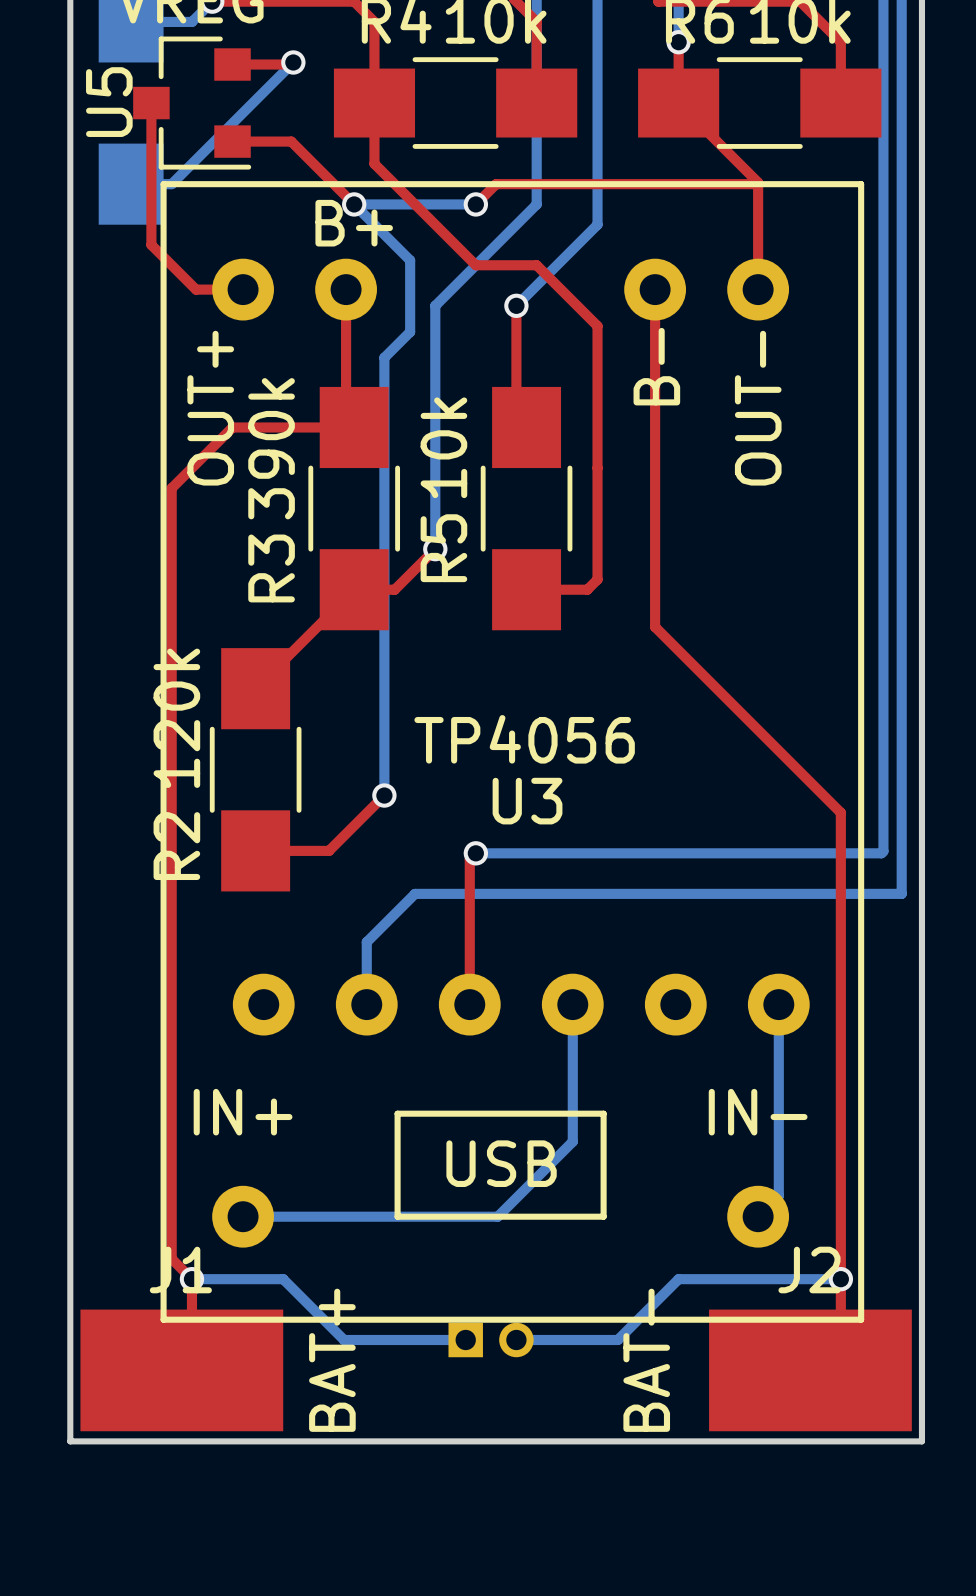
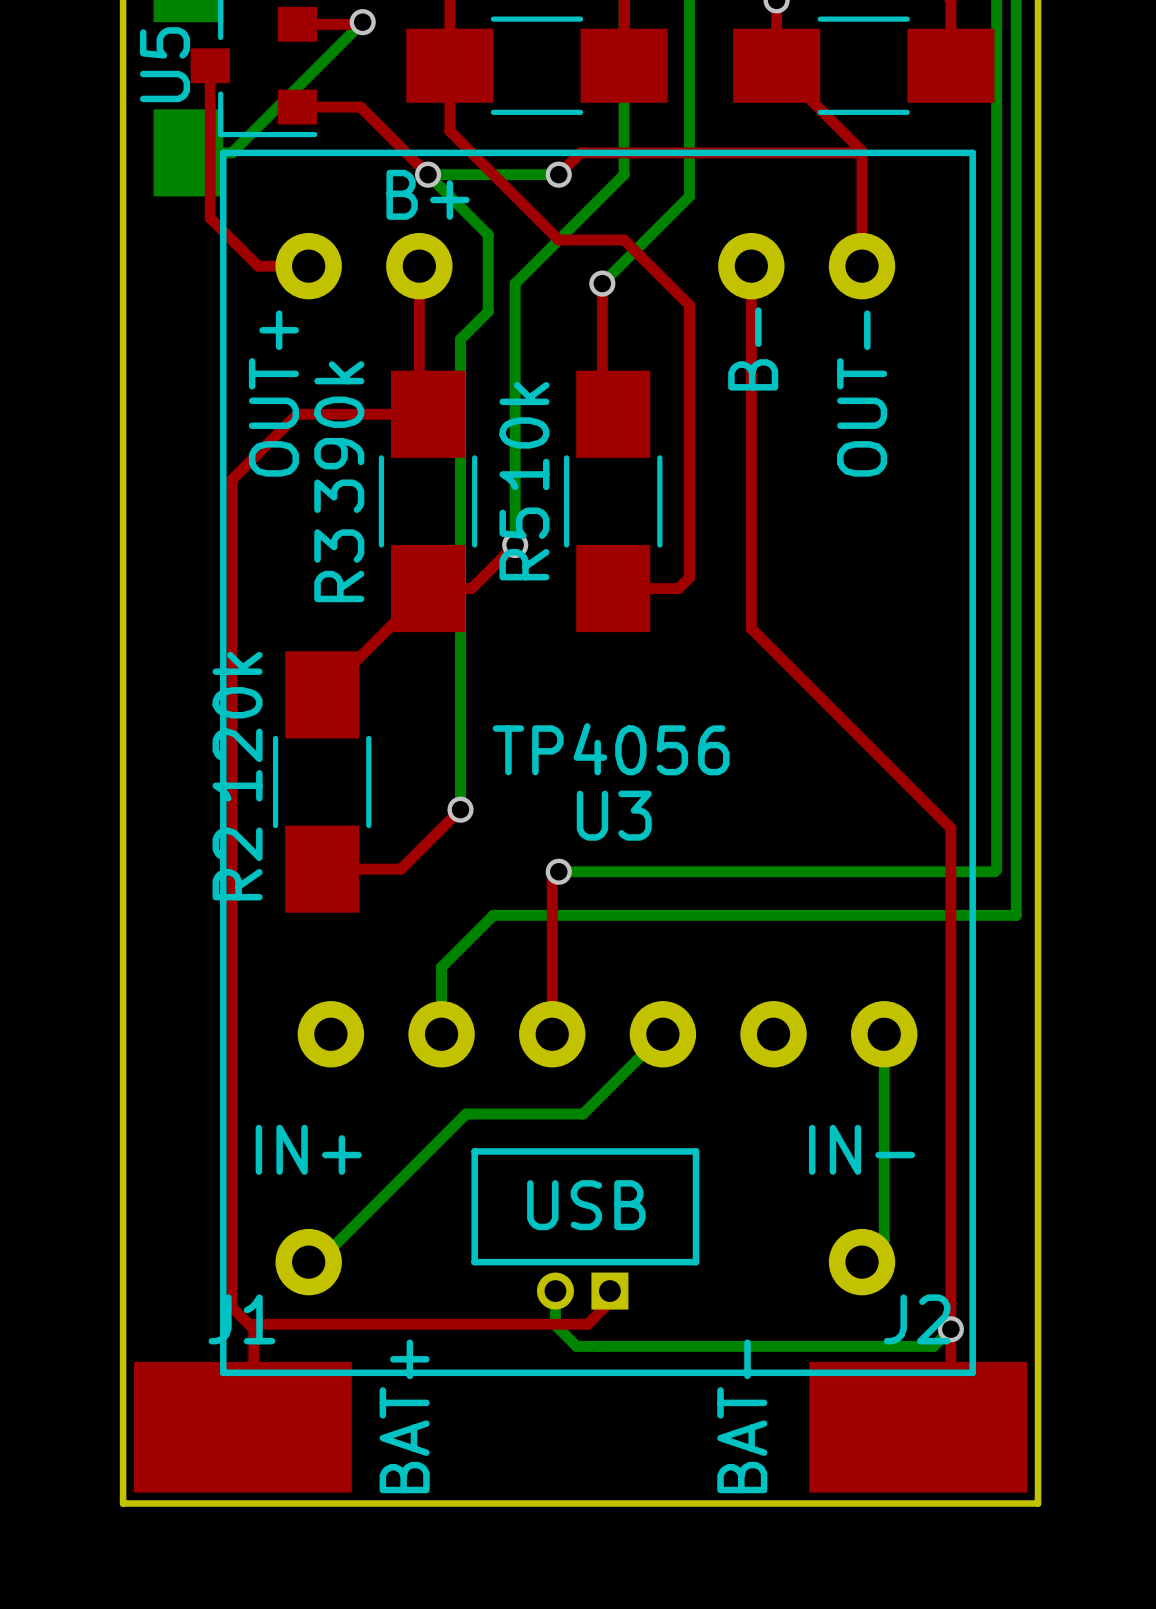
bottom track: (572, 1004) (572, 1141) (497, 1216) (251, 1216) -> (662, 1034) (583, 1114) (466, 1114) (317, 1262)
top track: none -> (620, 1291) (587, 1324) (253, 1324) (253, 1329)
bottom track: (191, 1279) (283, 1279) (344, 1339) (465, 1339) -> none
via: (191, 1279) -> none
bottom track: (840, 1279) (678, 1279) (617, 1339) (516, 1339) -> (950, 1329) (933, 1346) (576, 1346) (555, 1325) (555, 1291)
part rotation: 0° (491, 1339) -> 180° (582, 1291)
part position: (491, 1339) -> (582, 1291)

